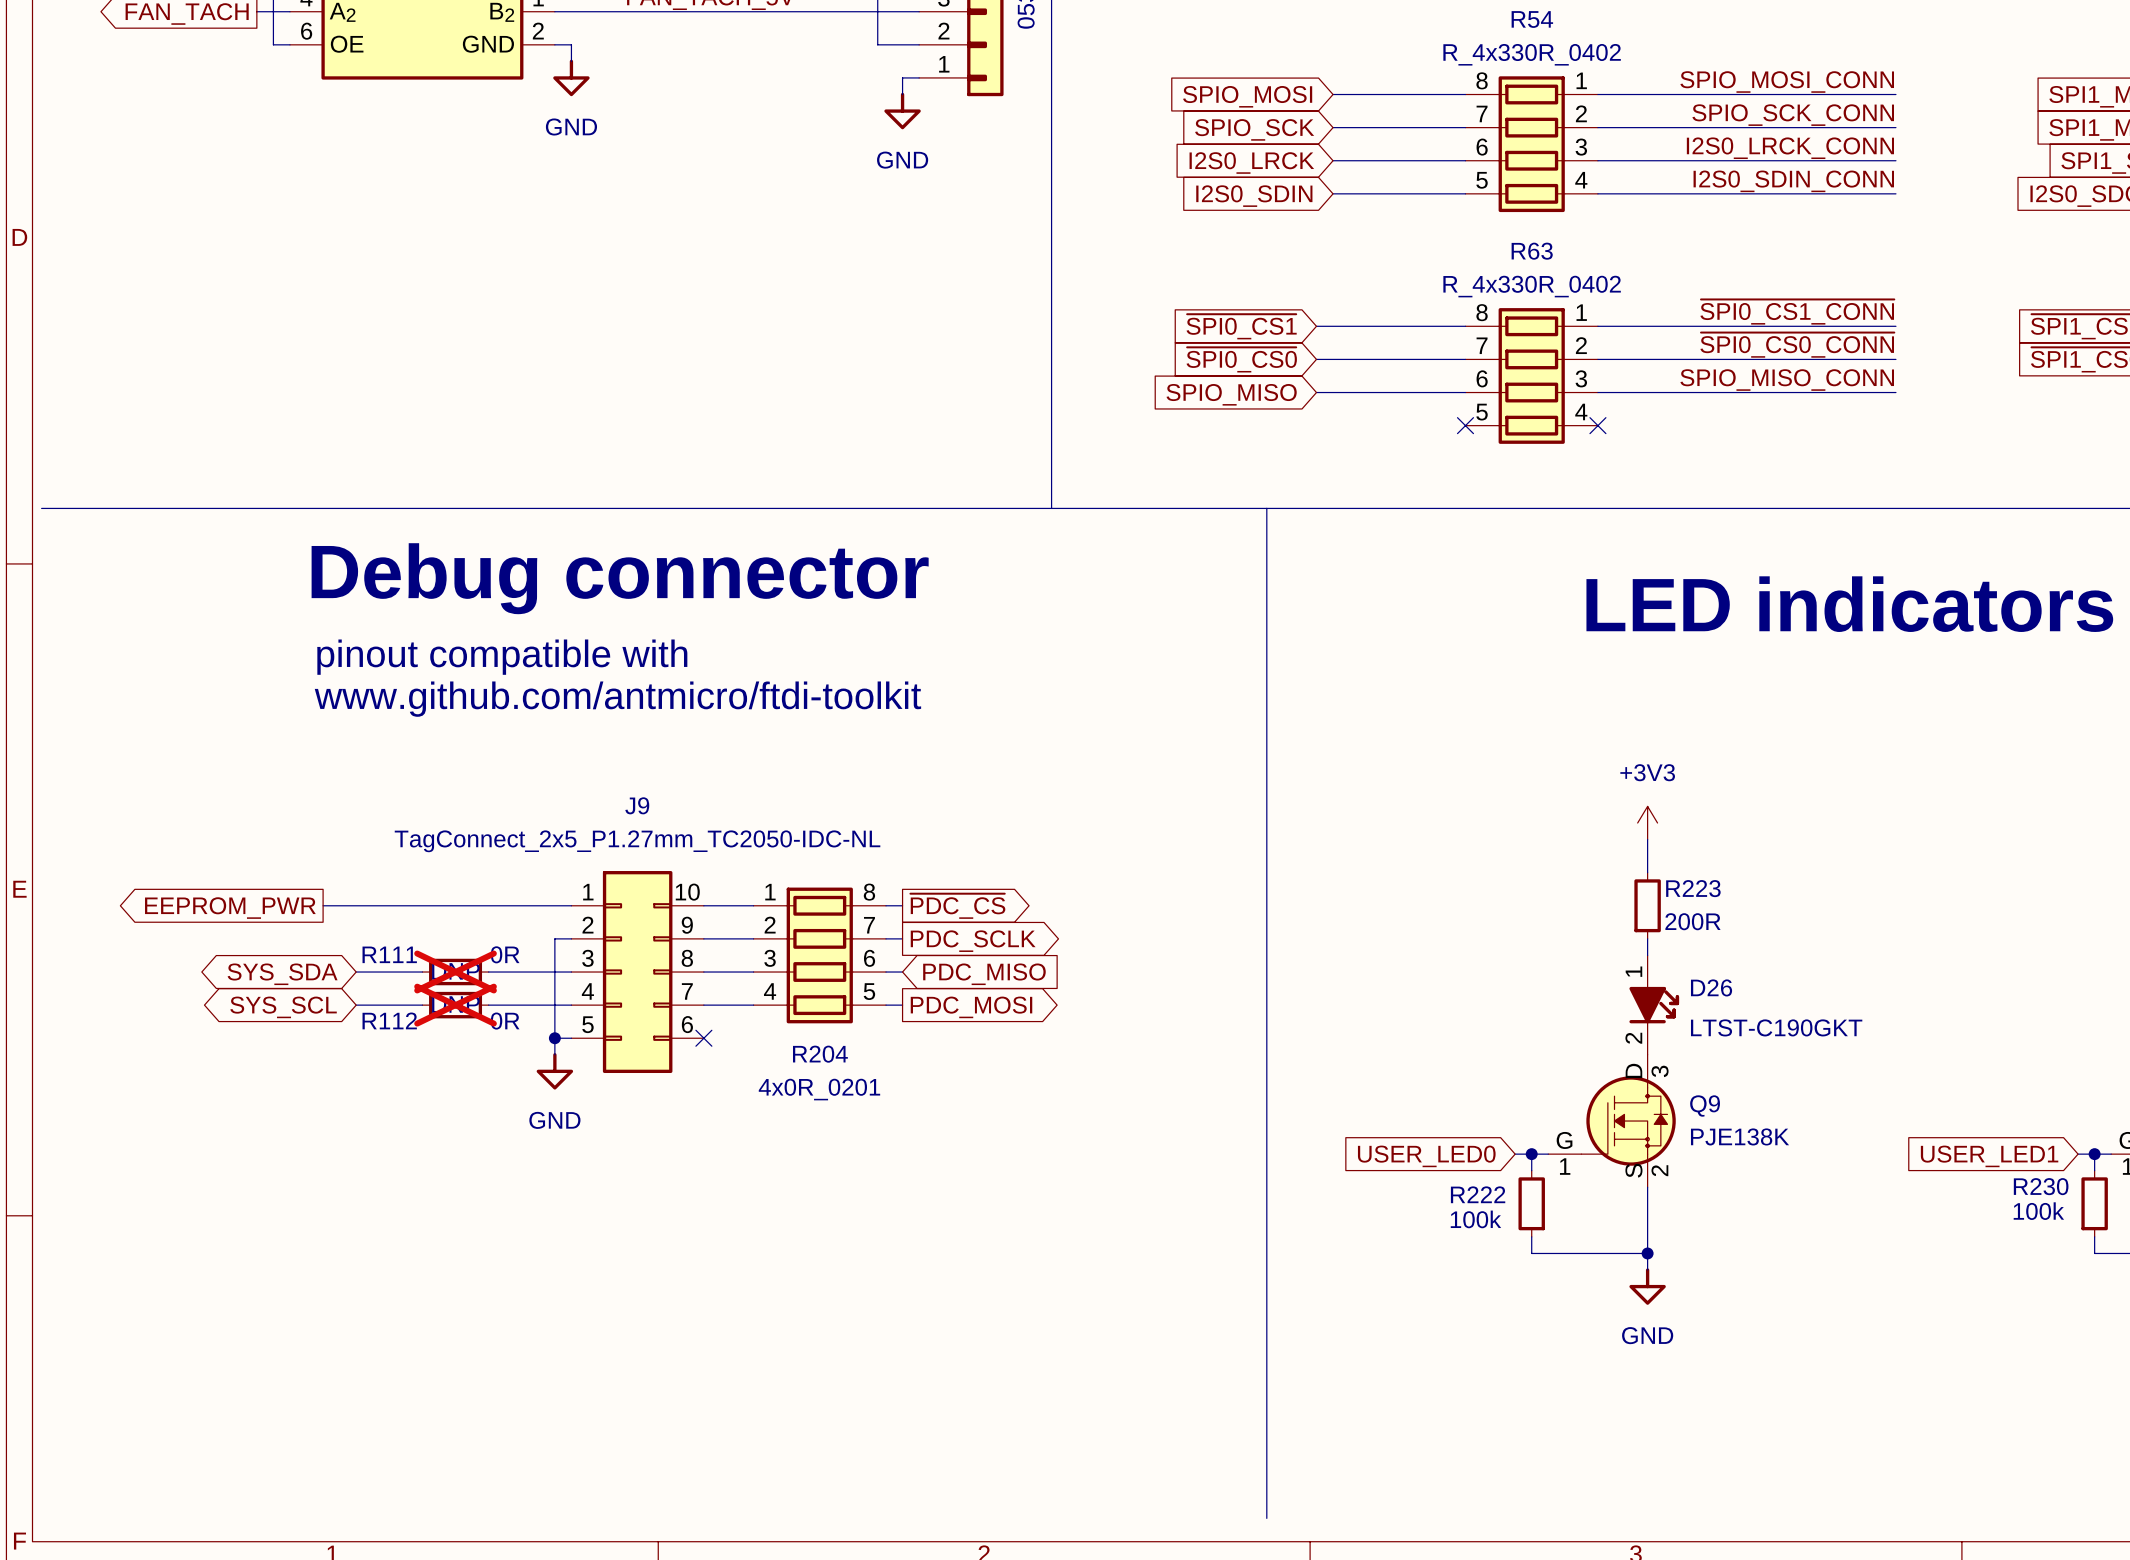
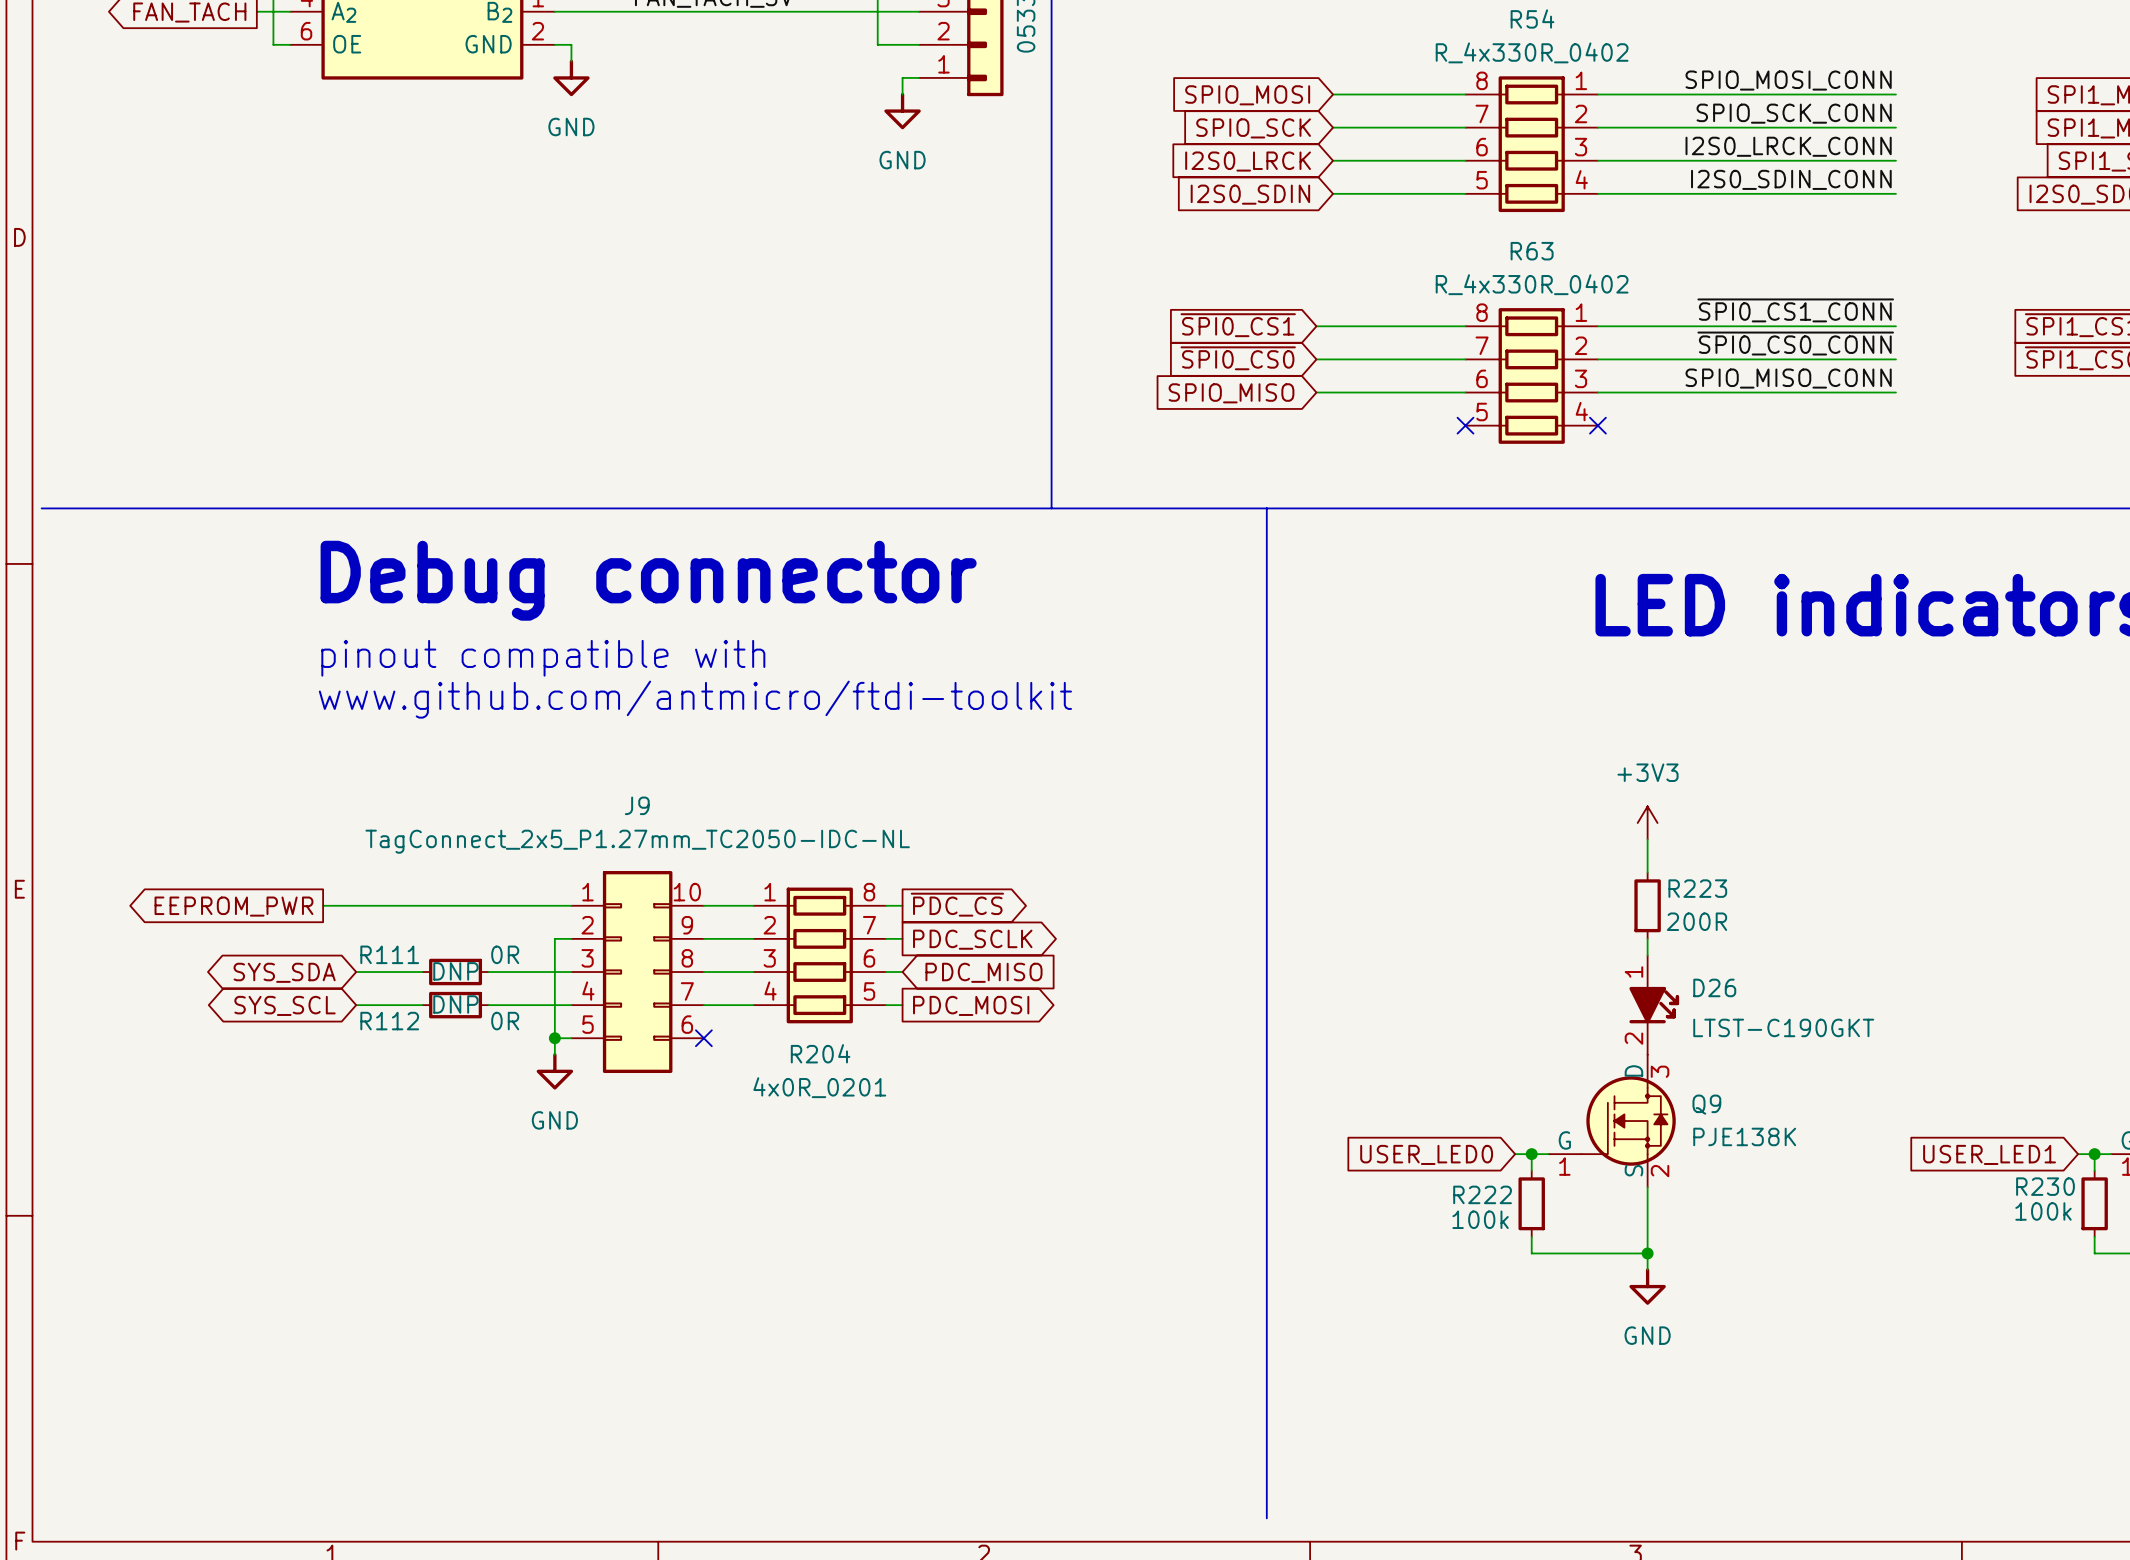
R111 do-not-place cross: (455, 972) -> none
R112 do-not-place cross: (455, 1005) -> none

